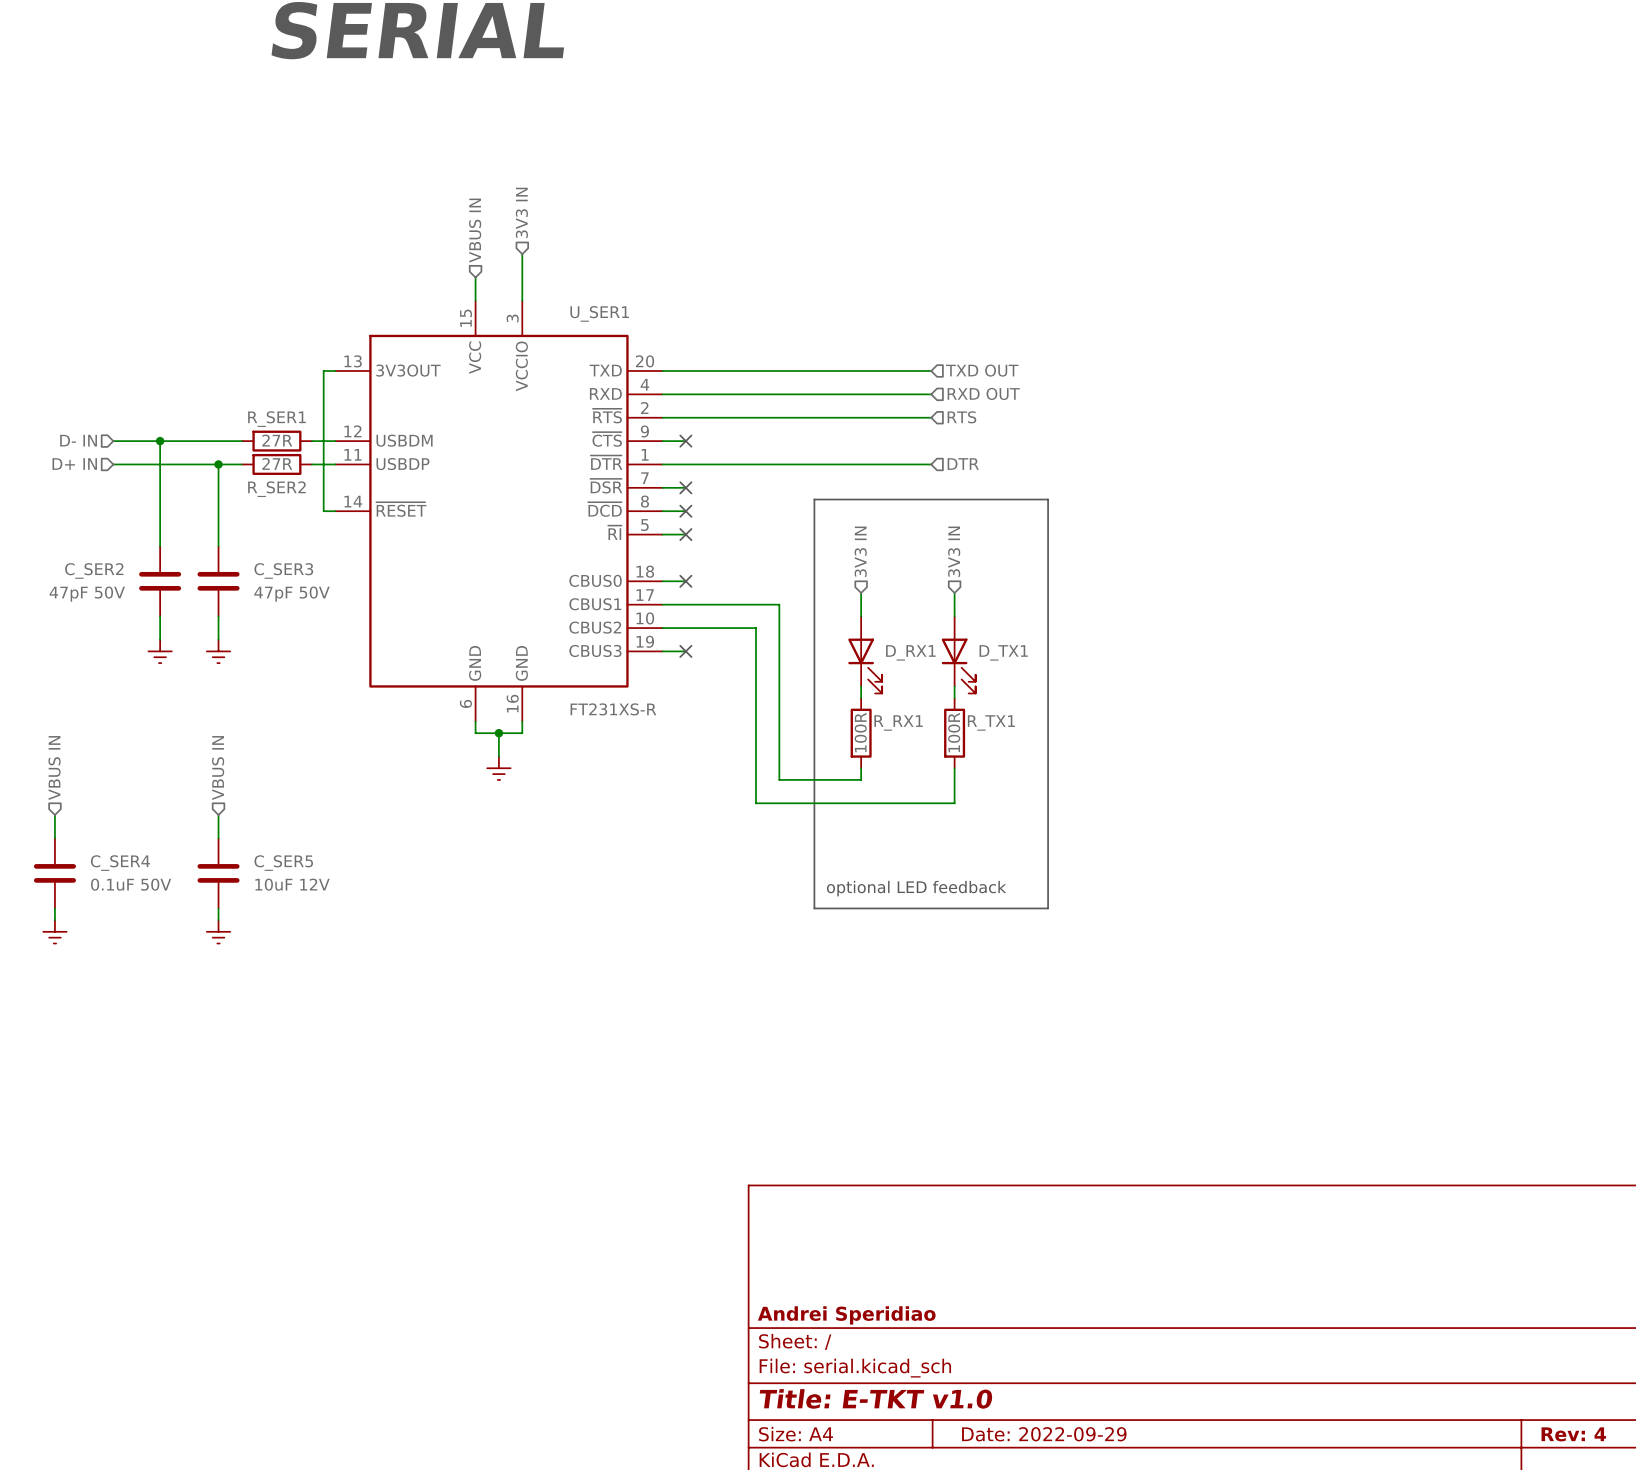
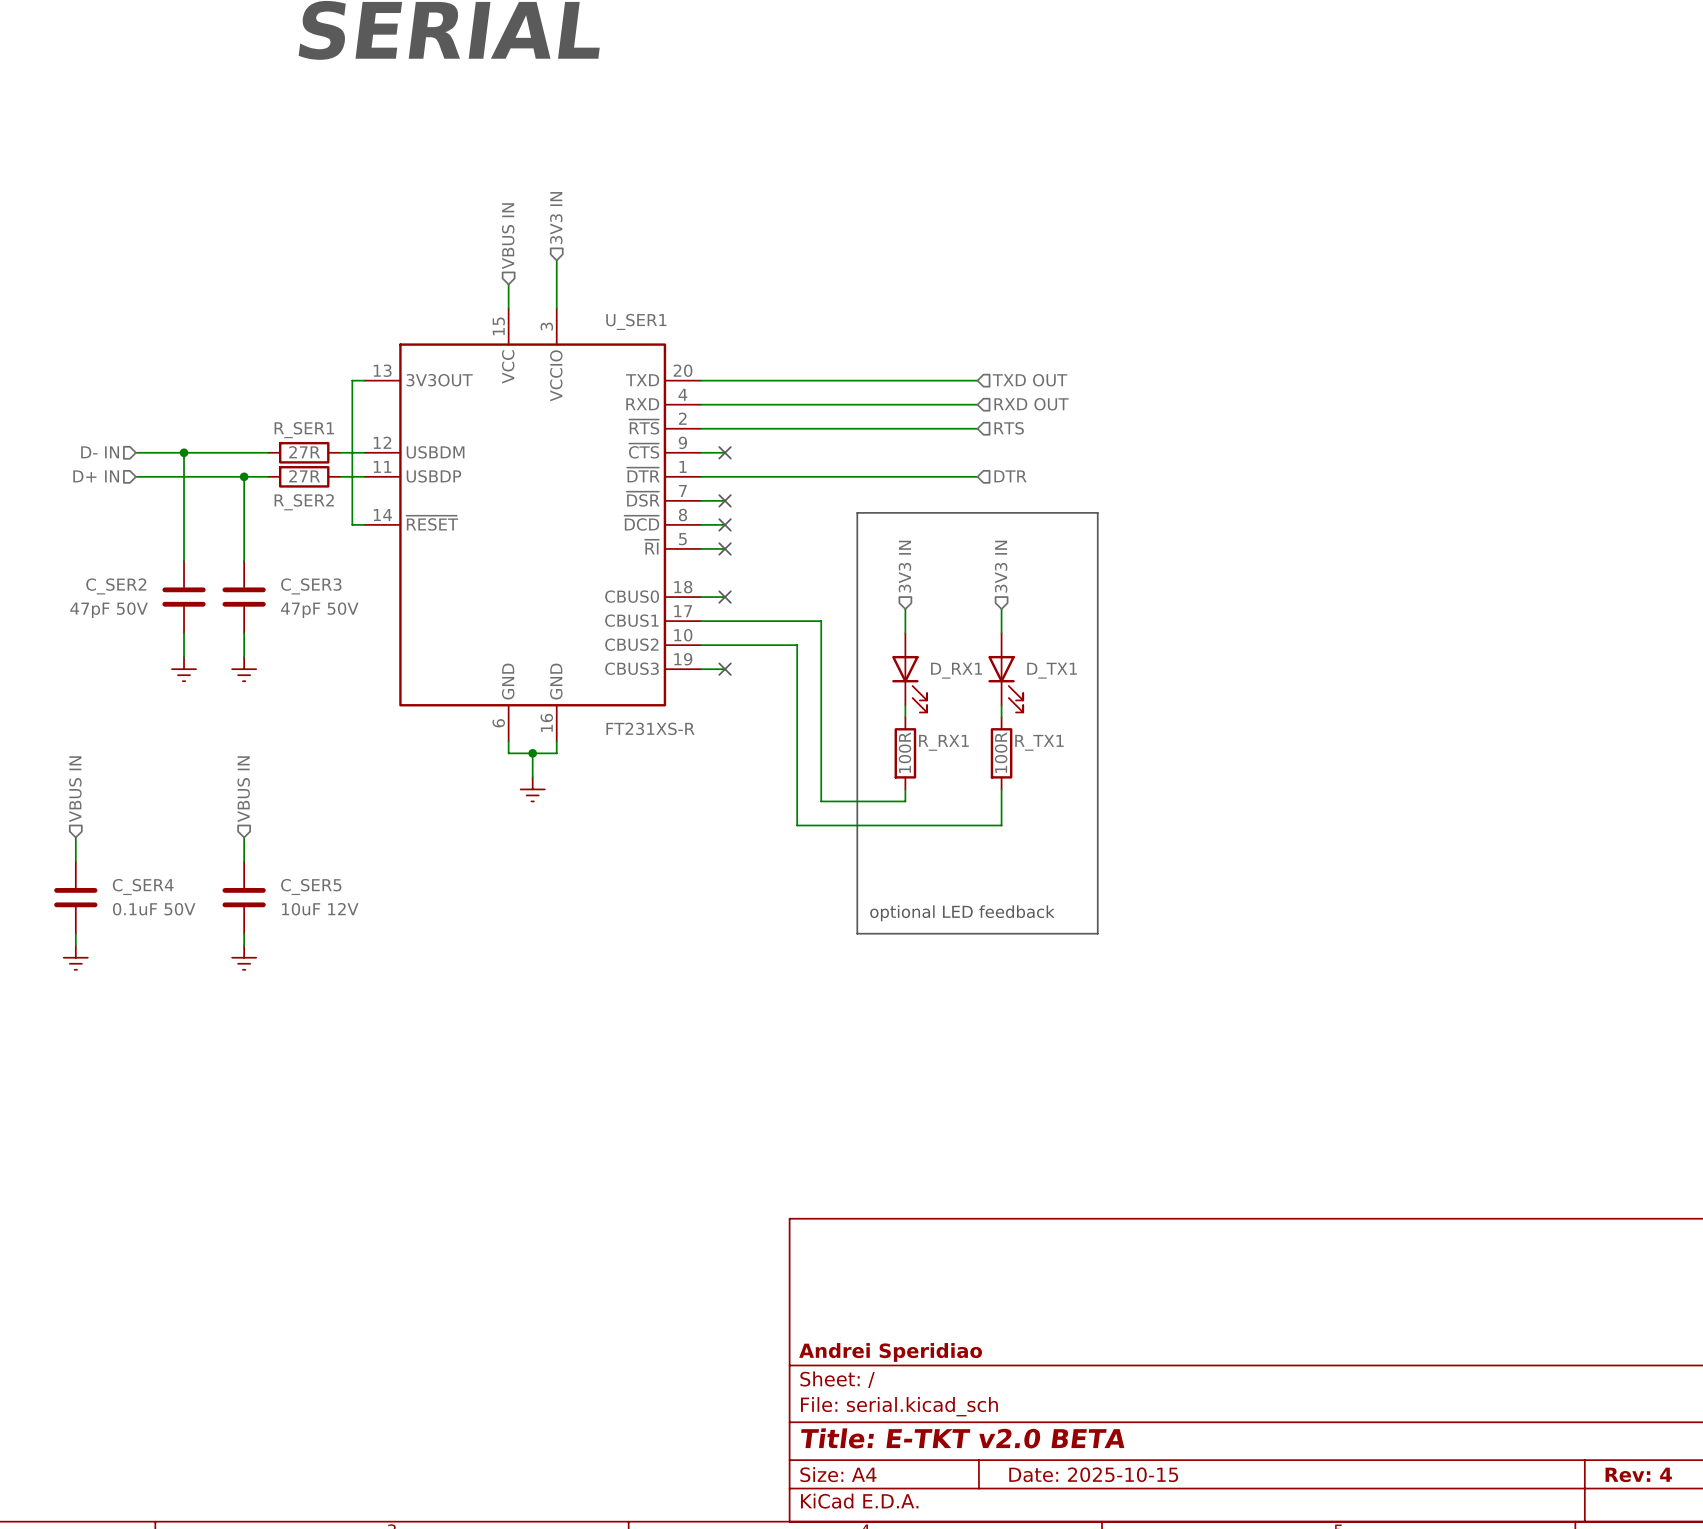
title block: Title: E-TKT v1.0 (876, 1398) -> Title: E-TKT v2.0 BETA (962, 1438)
title block: Date: 2022-09-29 (1044, 1434) -> Date: 2025-10-15 (1093, 1474)

